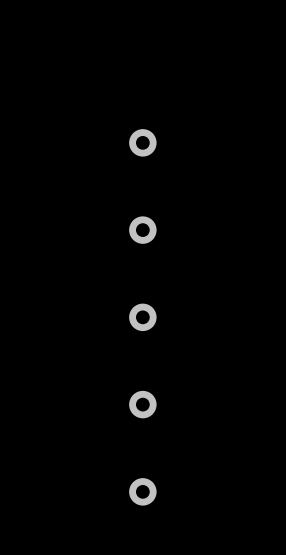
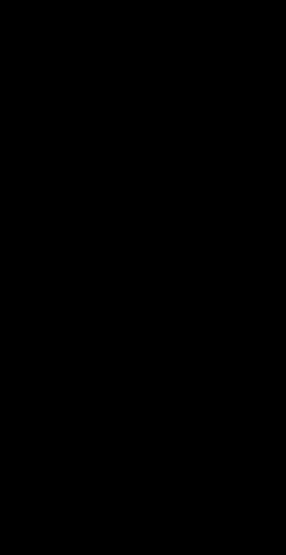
via: (142, 142) -> none
via: (142, 230) -> none
via: (142, 317) -> none
via: (142, 404) -> none
via: (142, 491) -> none

